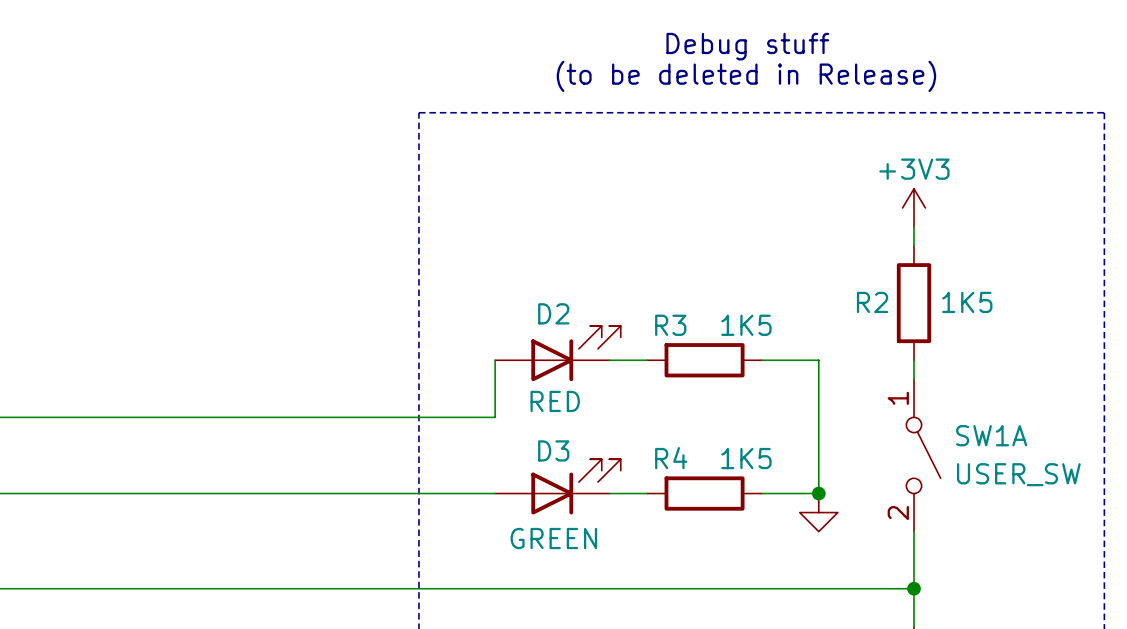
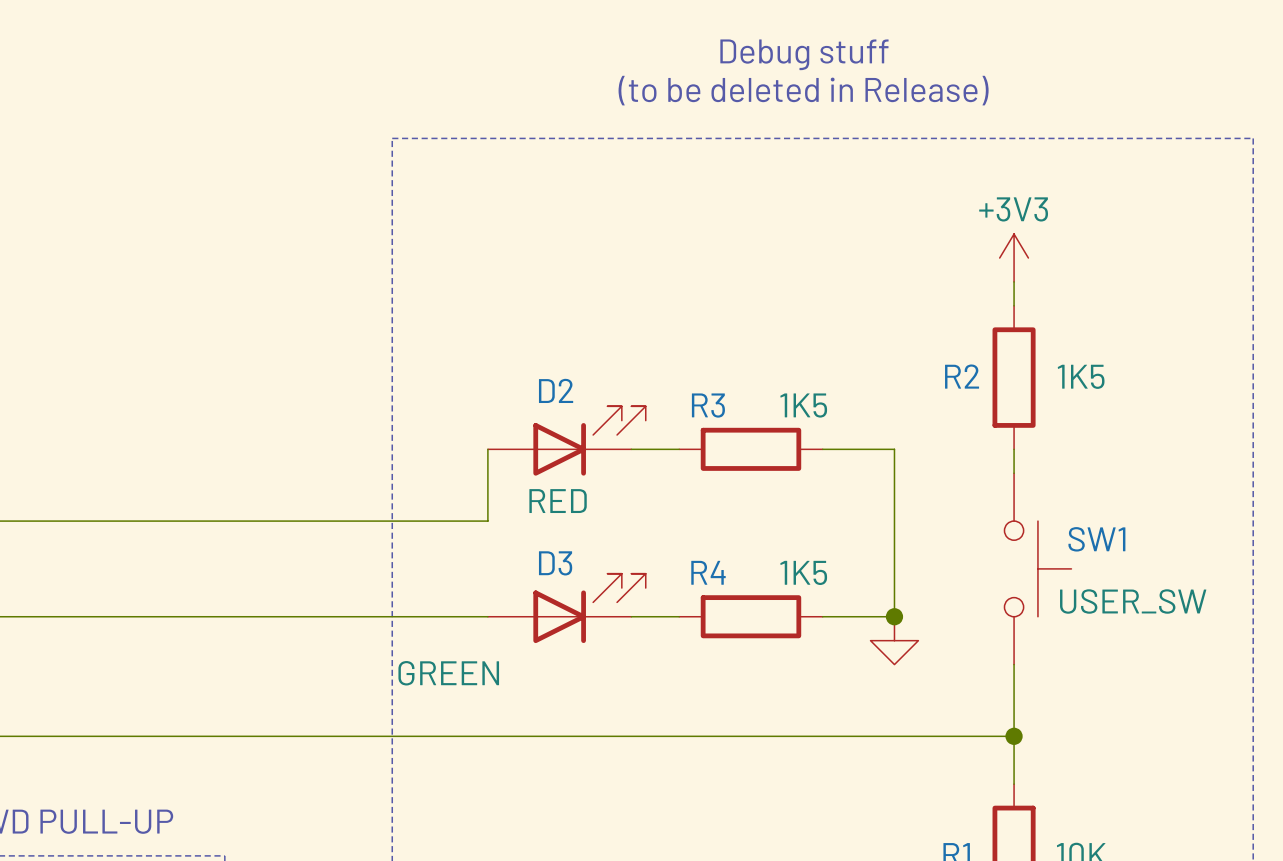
SW1A: USER_SW (923, 455) -> none
SW1: none -> USER_SW (1037, 568)
D3 value position: GREEN (553, 538) -> GREEN (448, 673)

